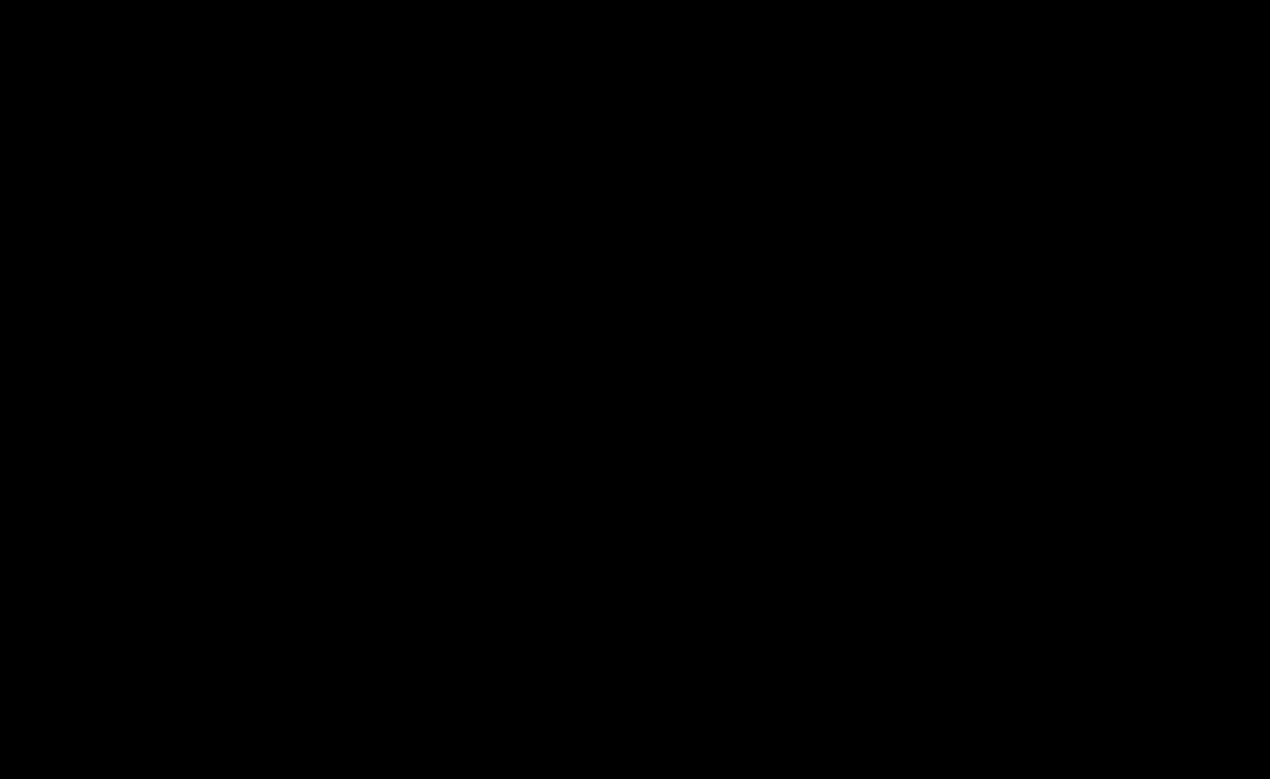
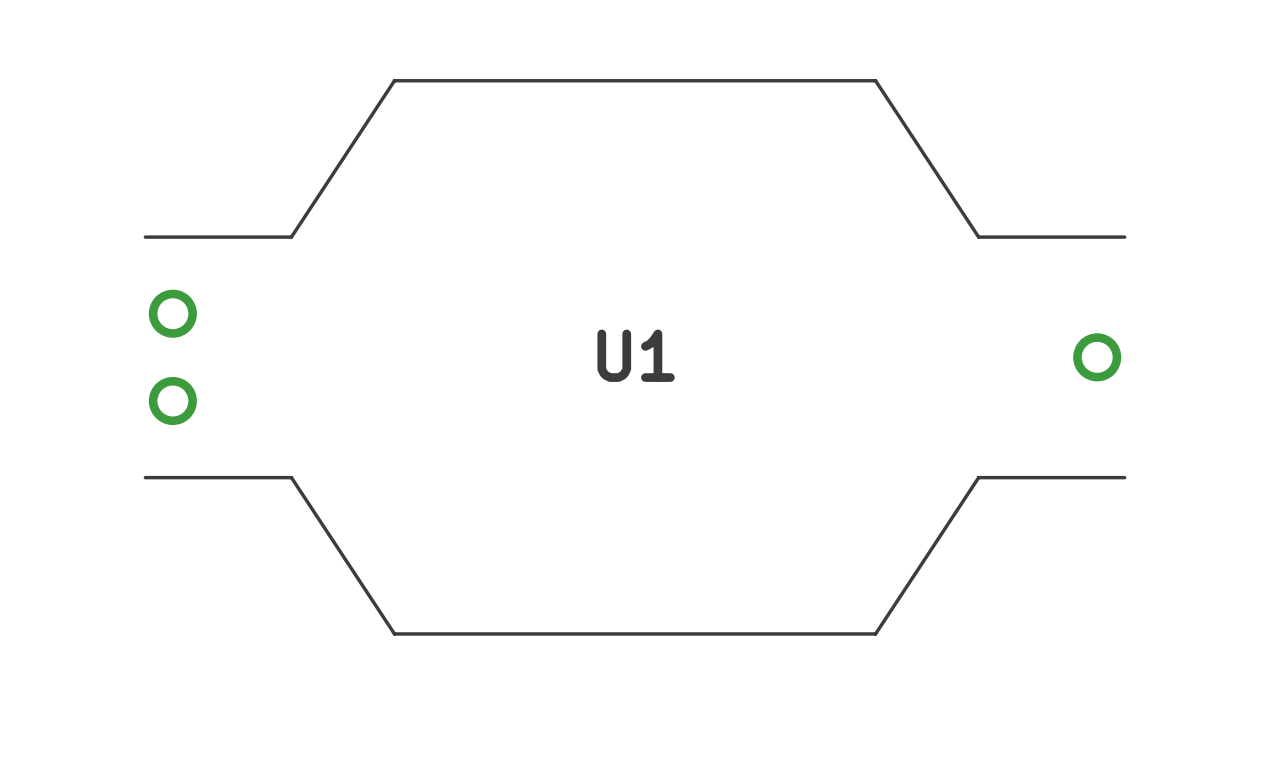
U1: none -> (635, 357)

